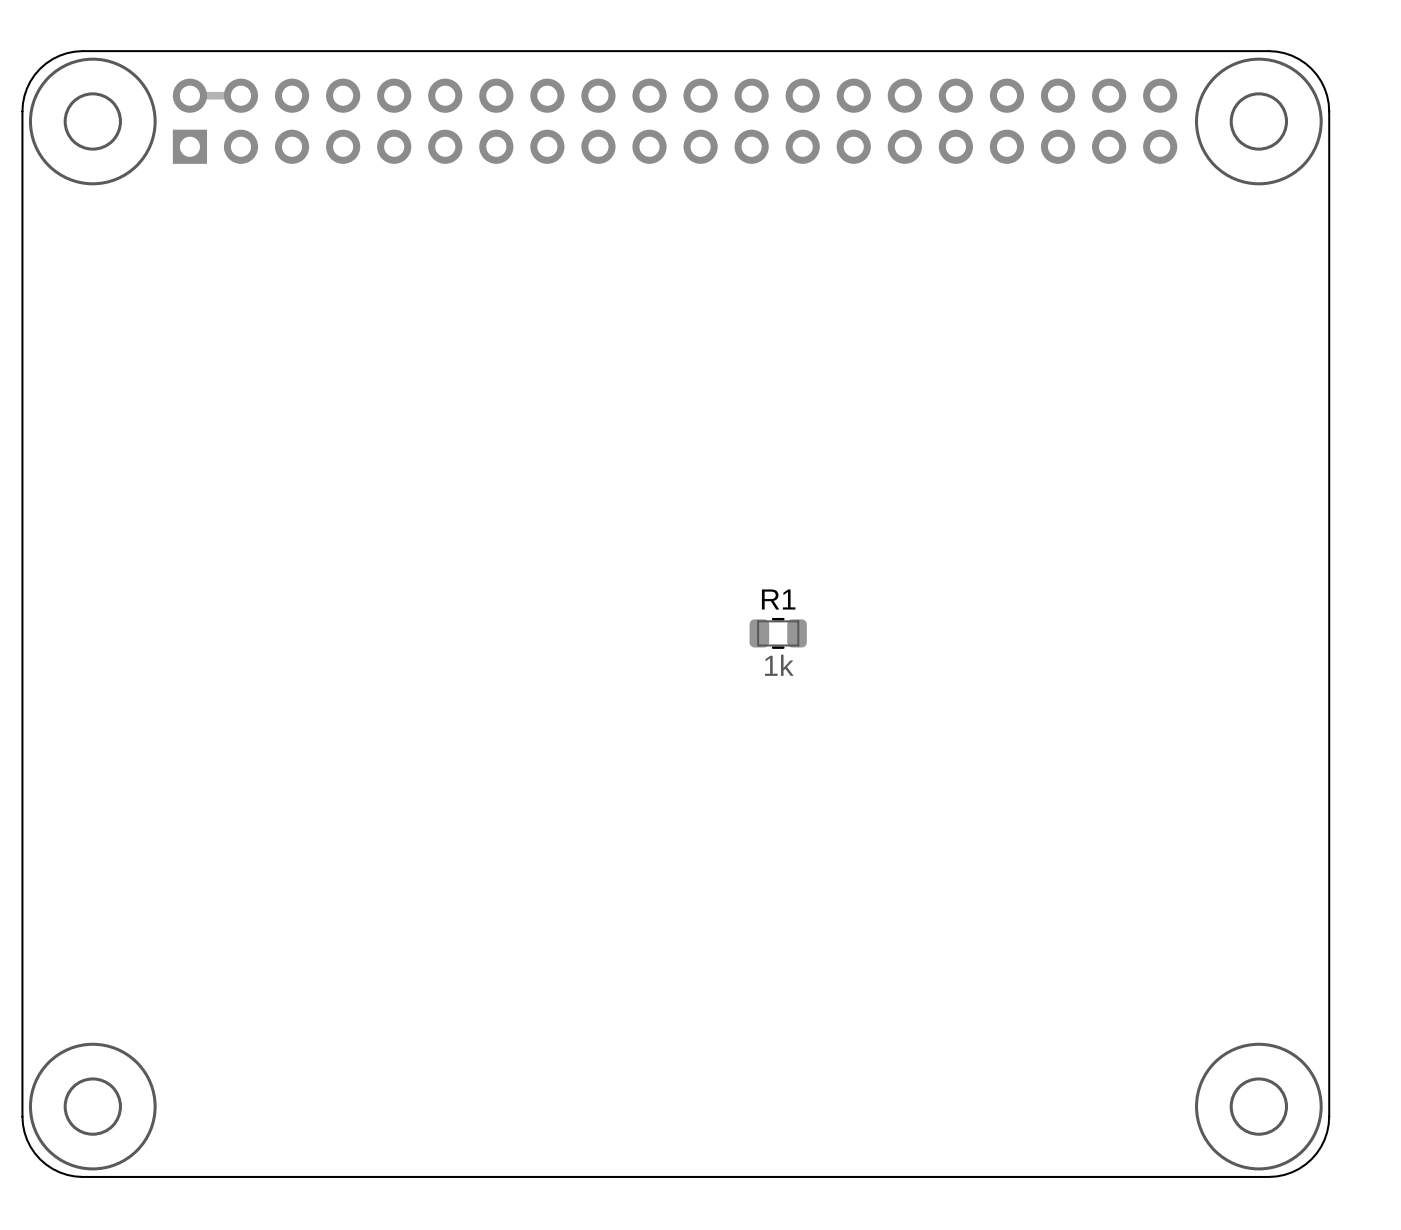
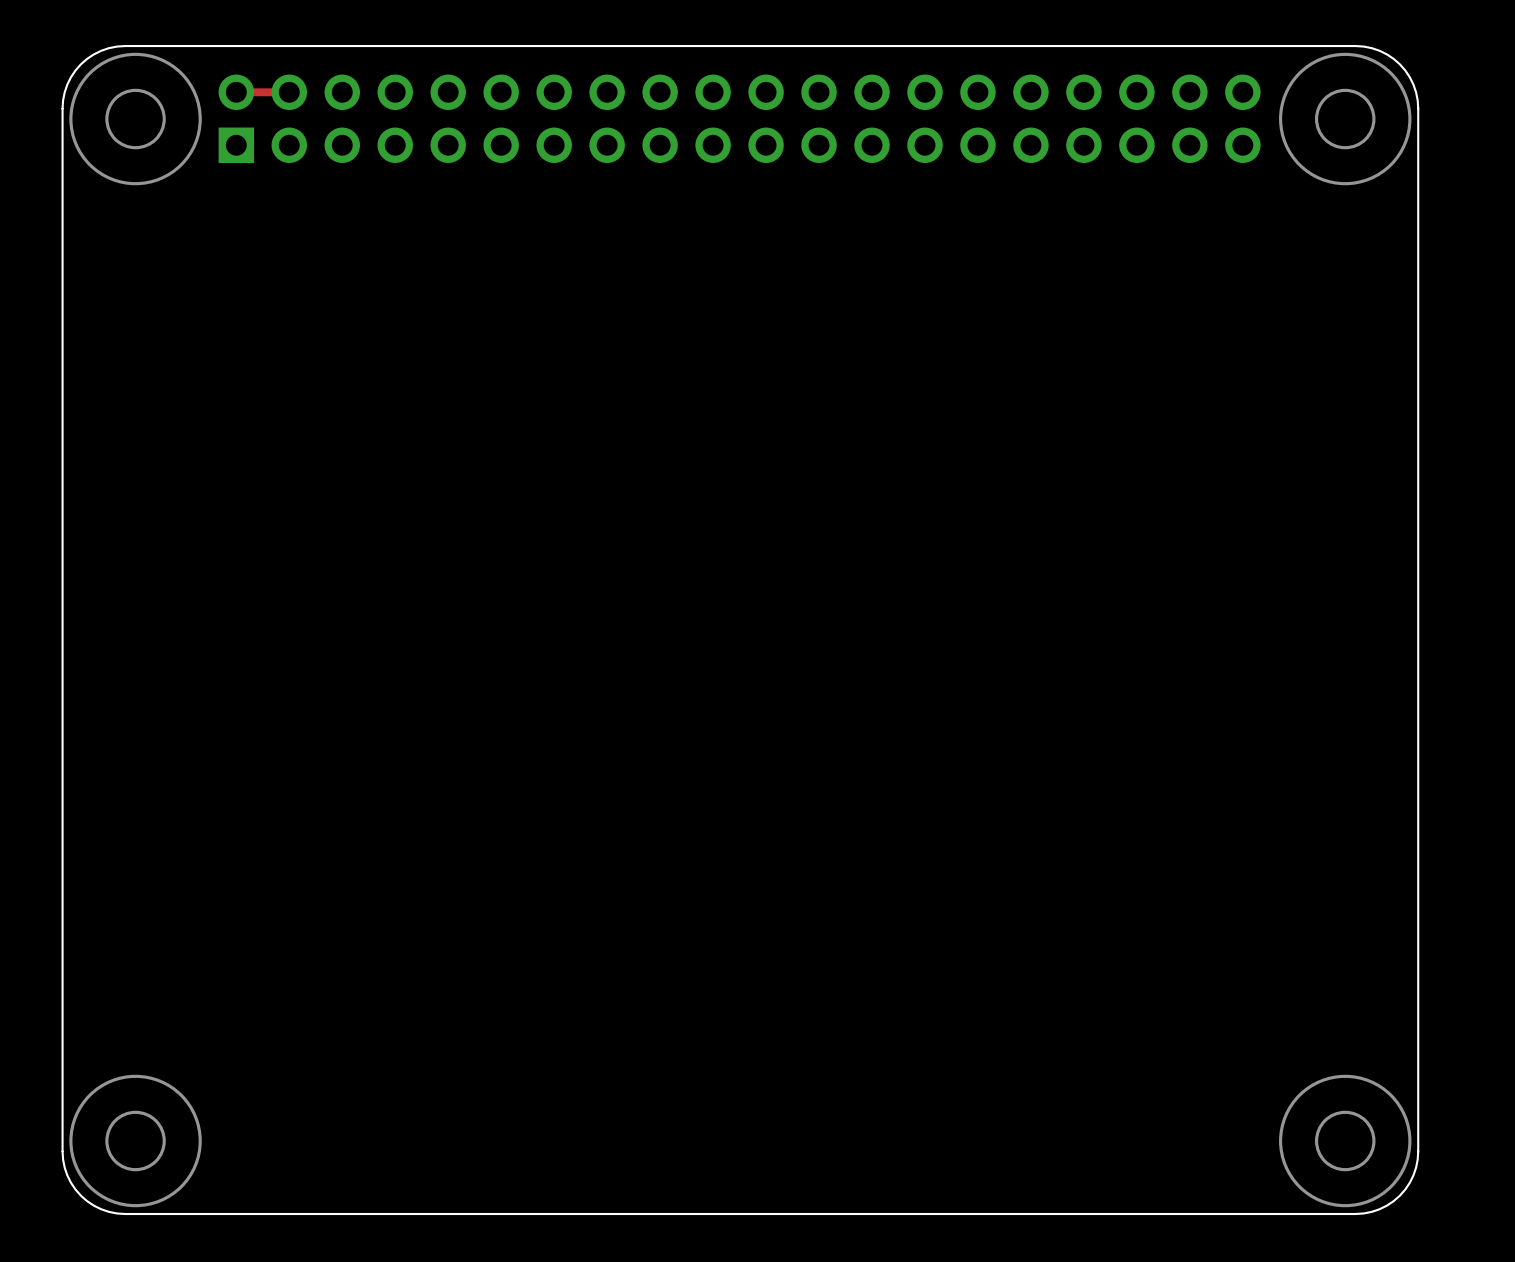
R1: 1k (778, 633) -> none

